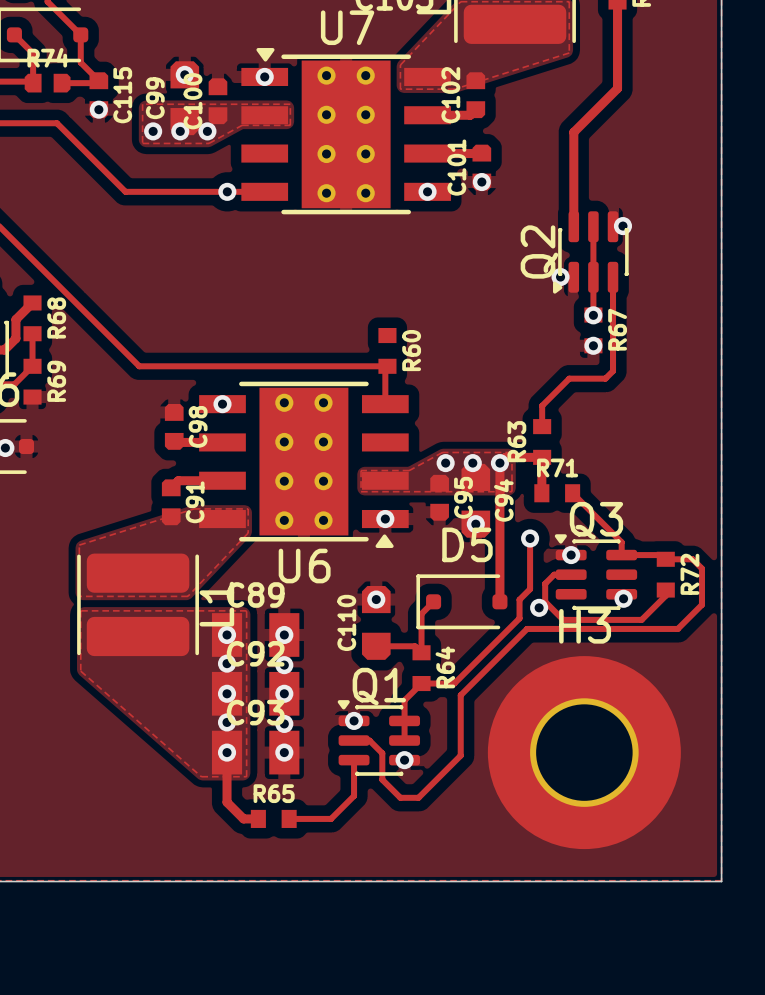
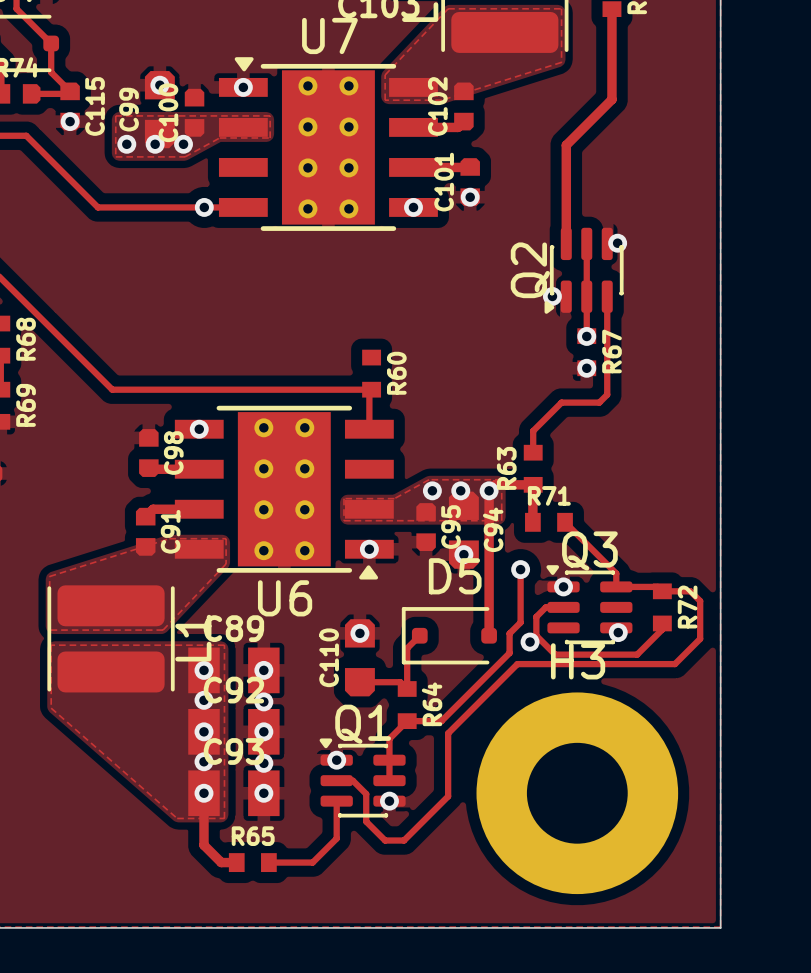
H3 footprint: [487, 656, 681, 850] -> [476, 692, 679, 895]

